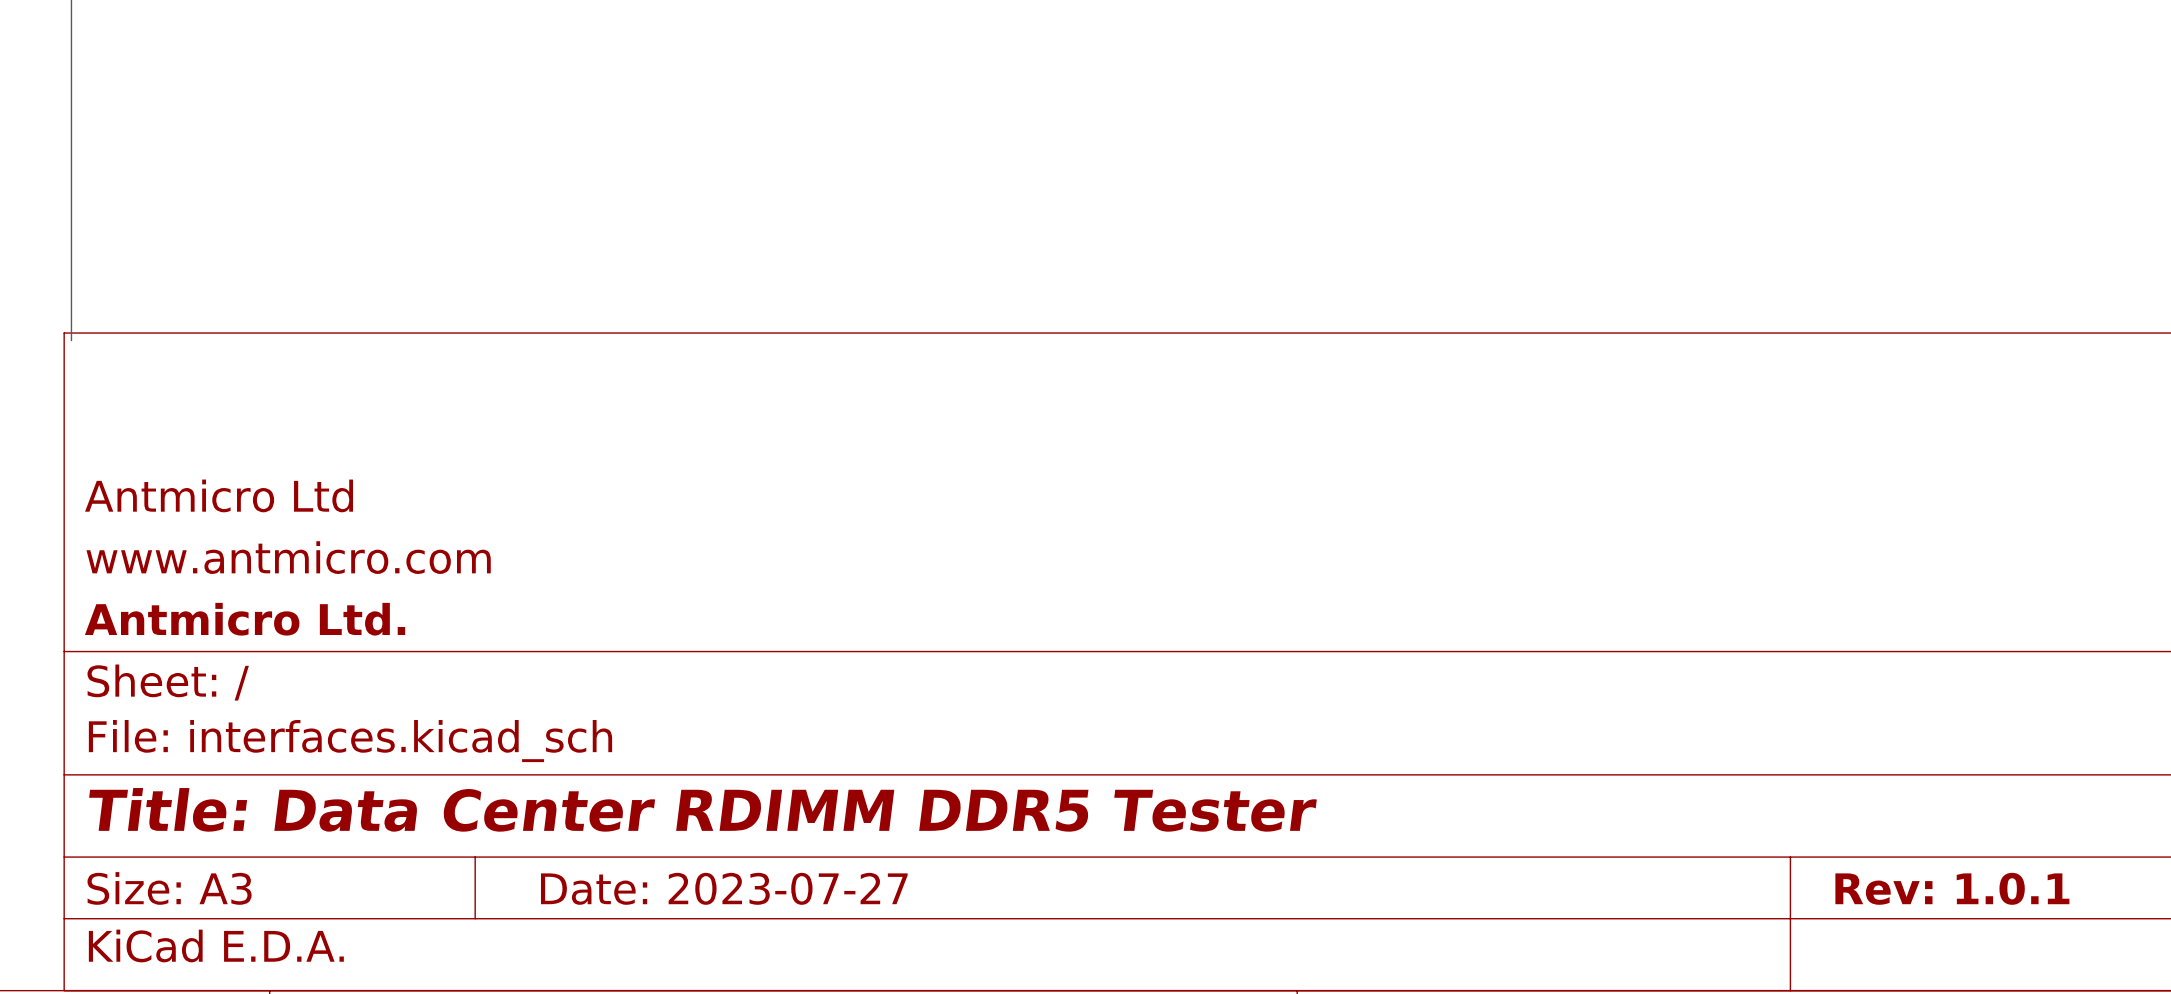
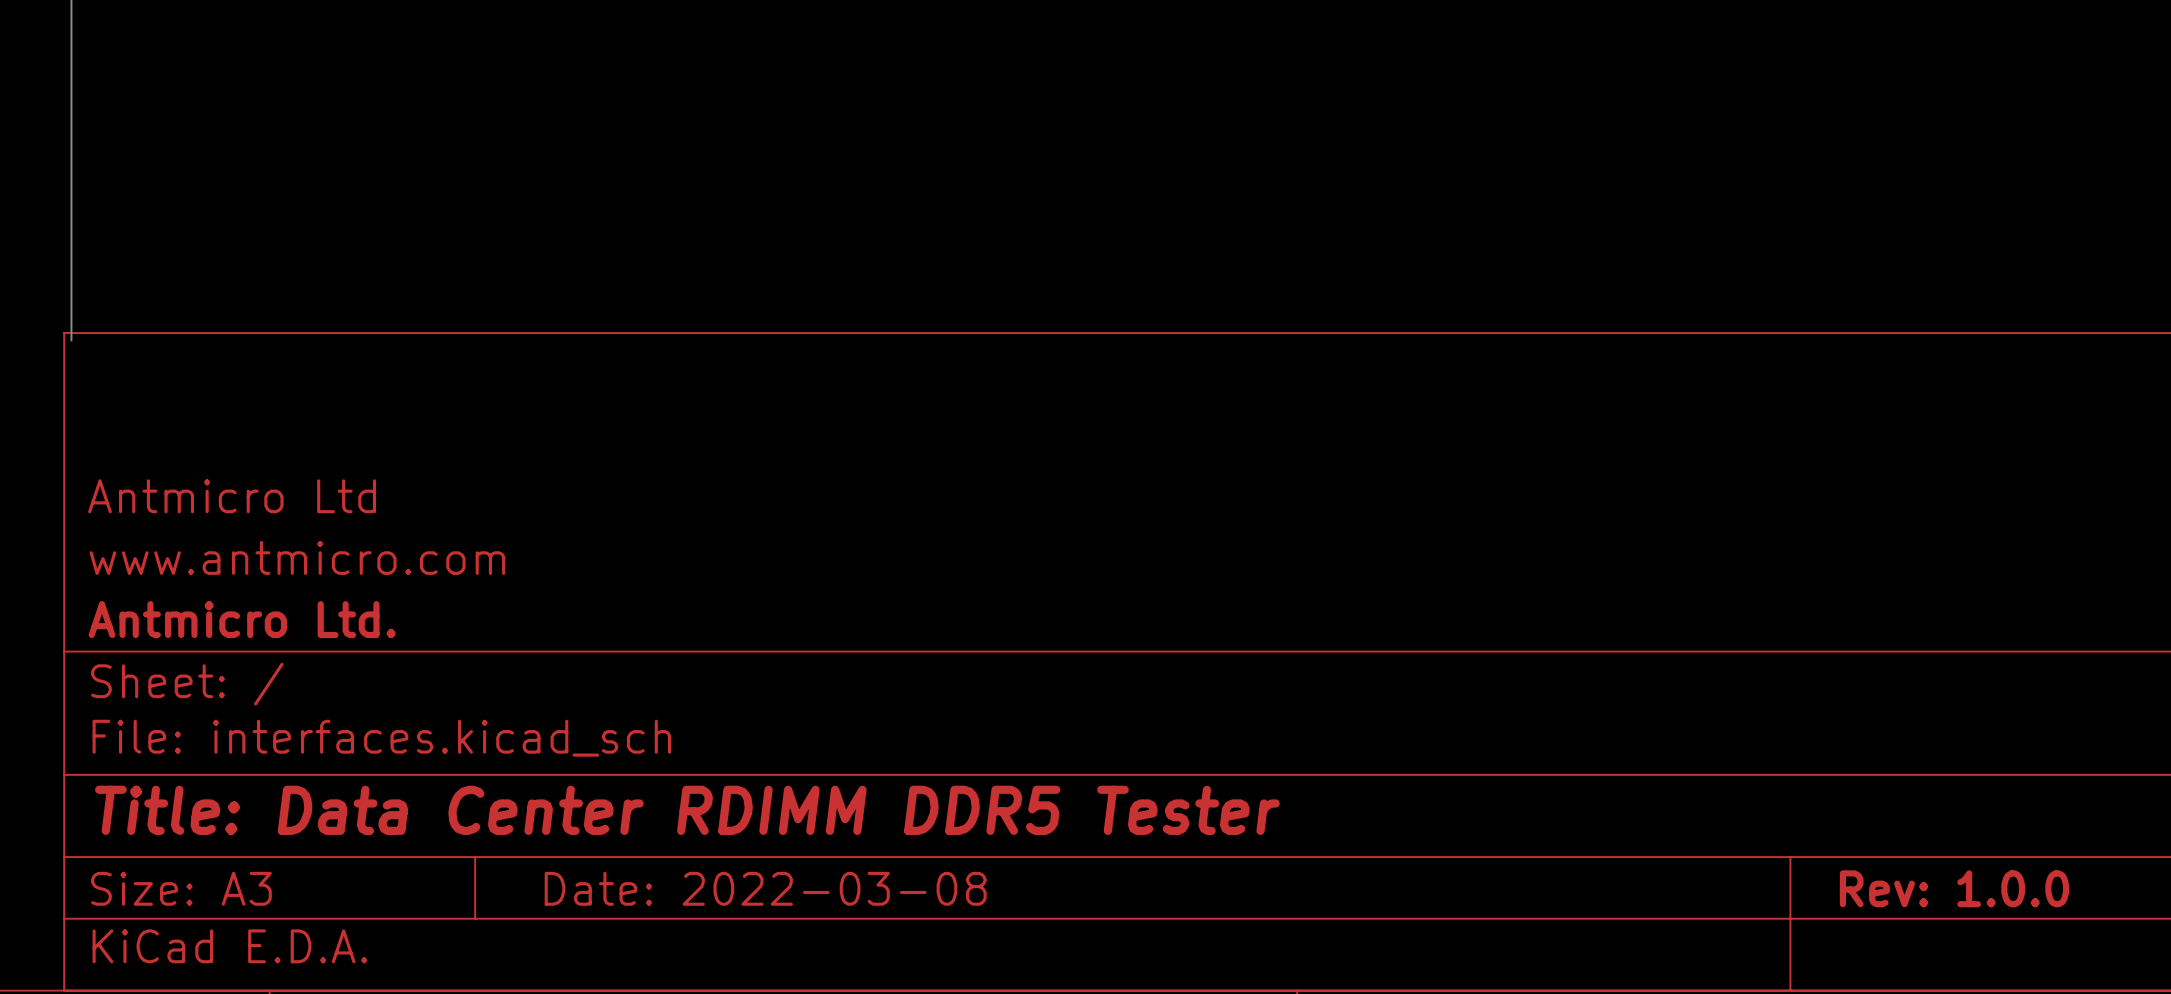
title block: Date: 2023-07-27 (724, 888) -> Date: 2022-03-08 (765, 888)
title block: Rev: 1.0.1 (1952, 888) -> Rev: 1.0.0 (1954, 888)

